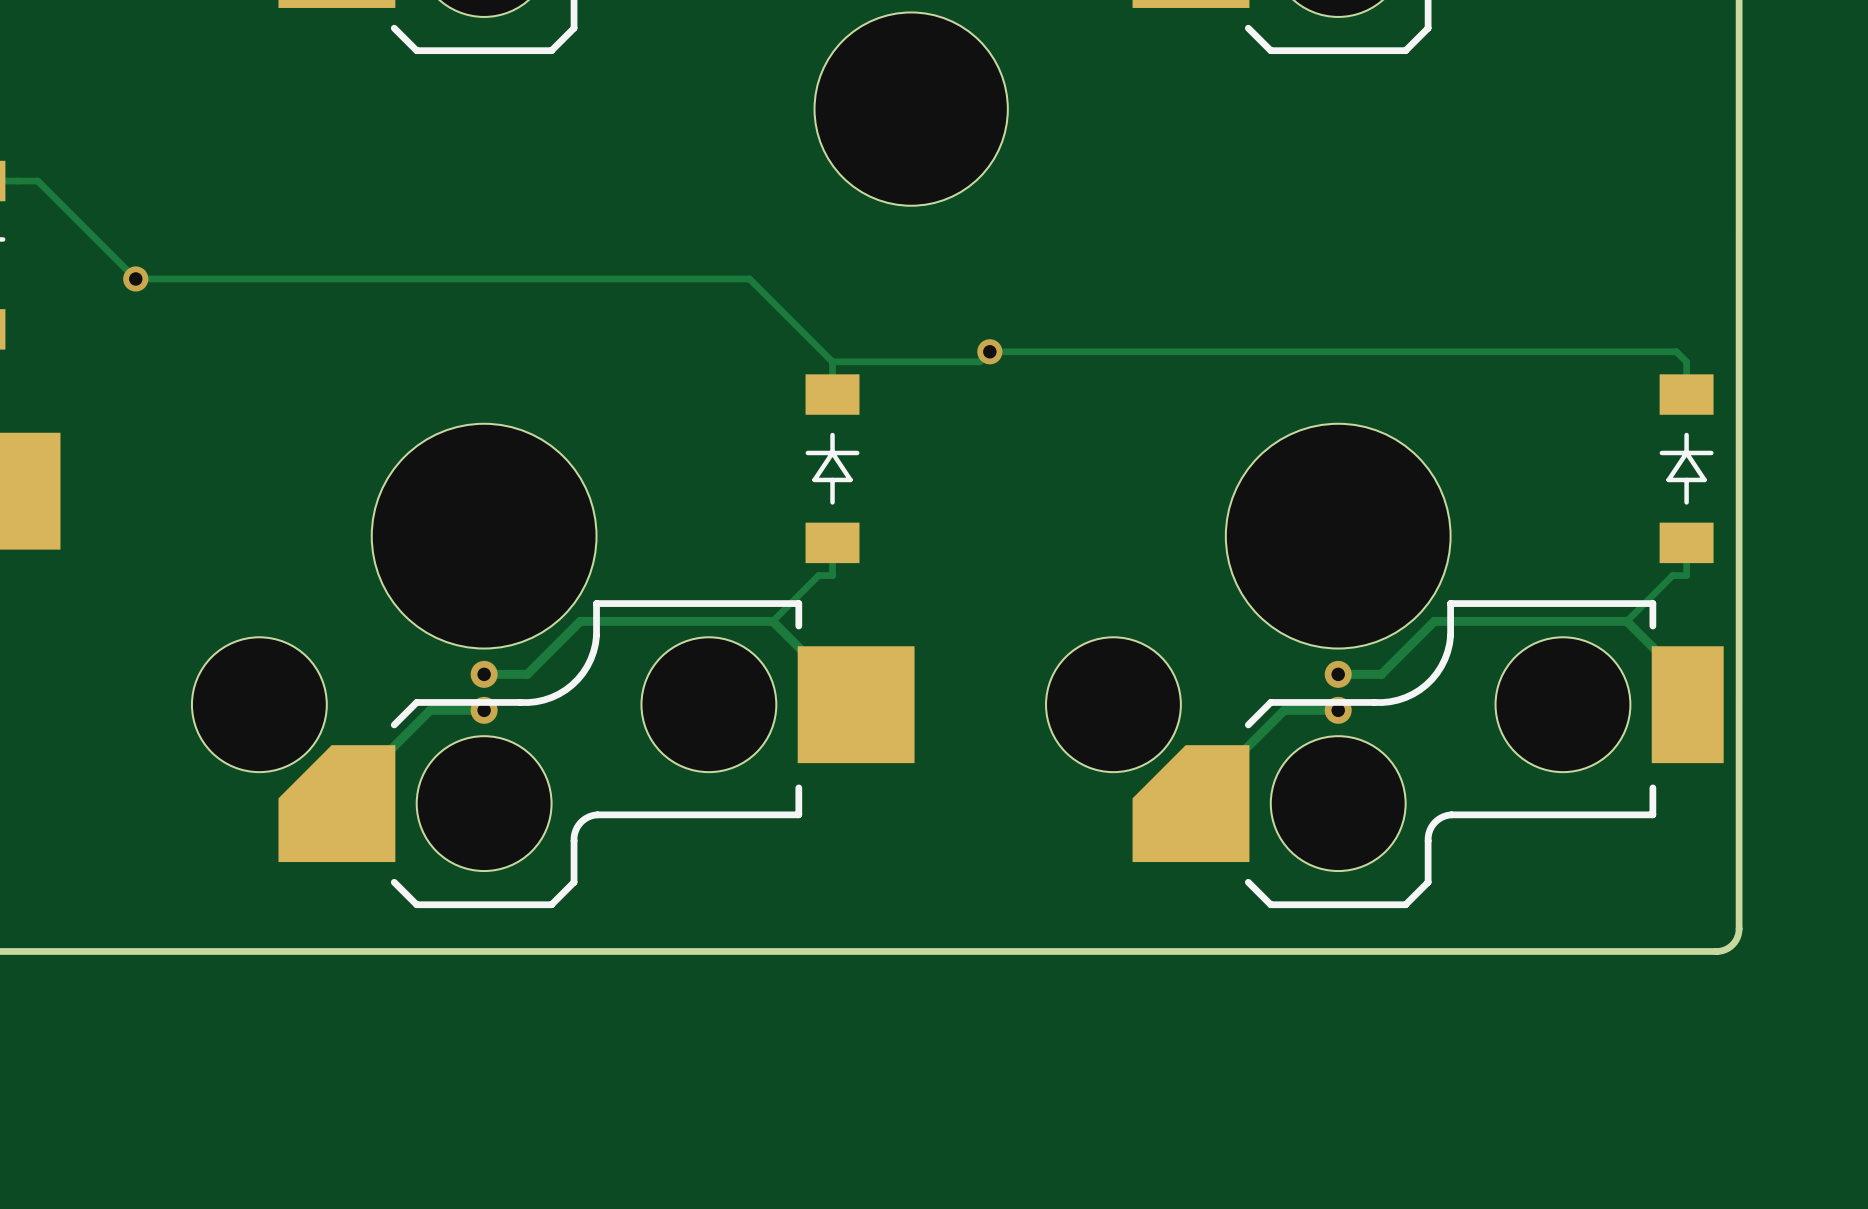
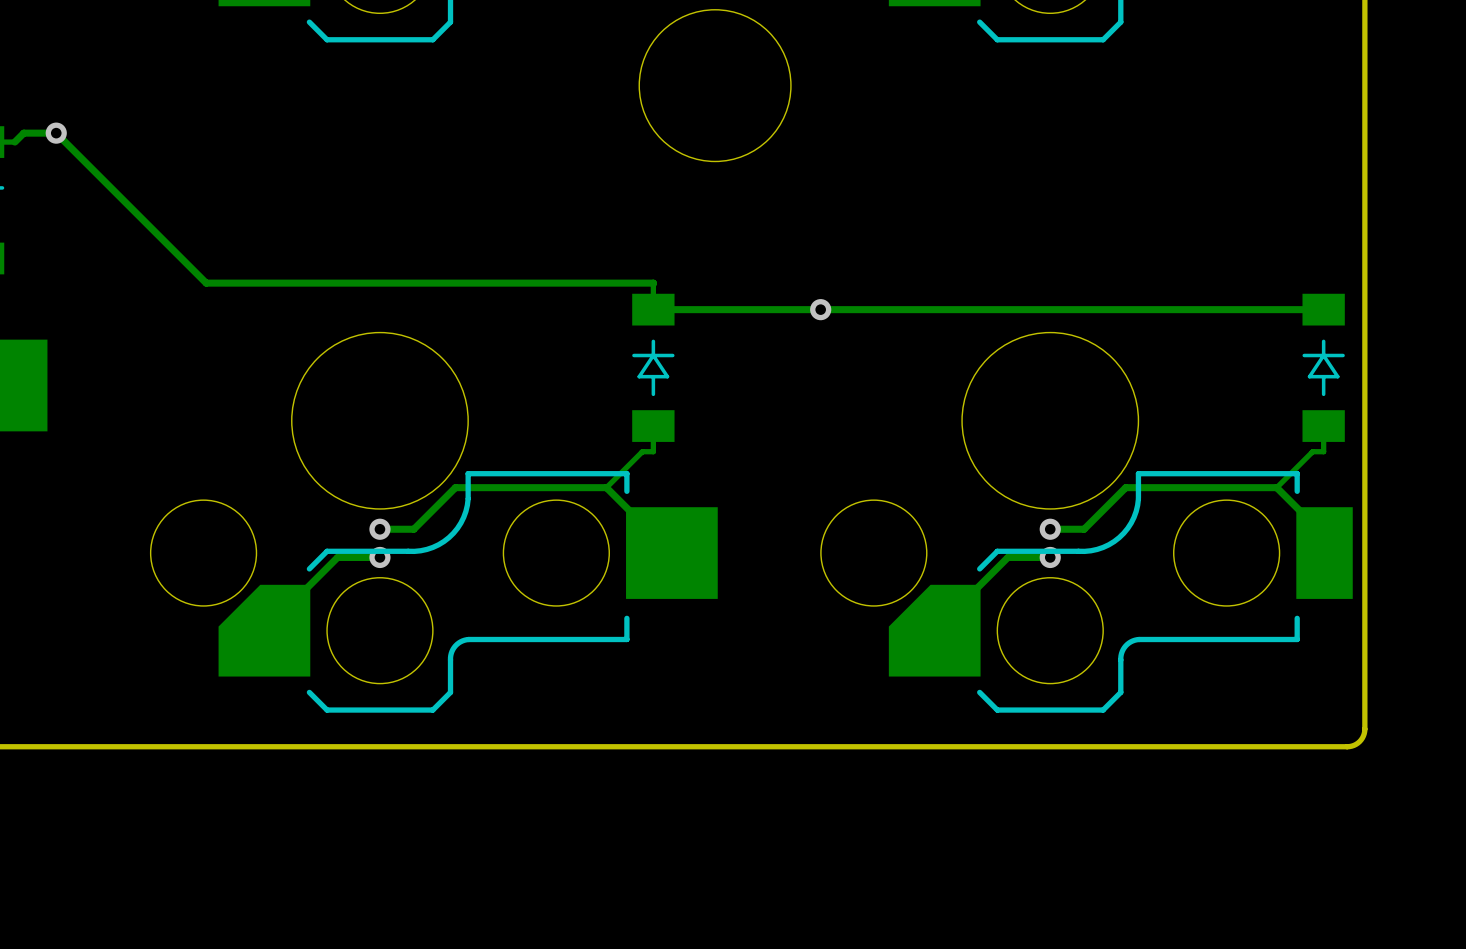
via: none -> (56, 133)
track: (18, 181) (37, 181) (135, 278) (749, 278) (832, 361) (979, 361) (989, 351) (1676, 351) (1686, 361) (1686, 394) -> (653, 309) (1323, 309)
track: none -> (14, 142) (23, 133) (56, 133) (206, 283) (653, 284)
via: (135, 278) -> none
via: (989, 351) -> none
via: none -> (820, 309)

